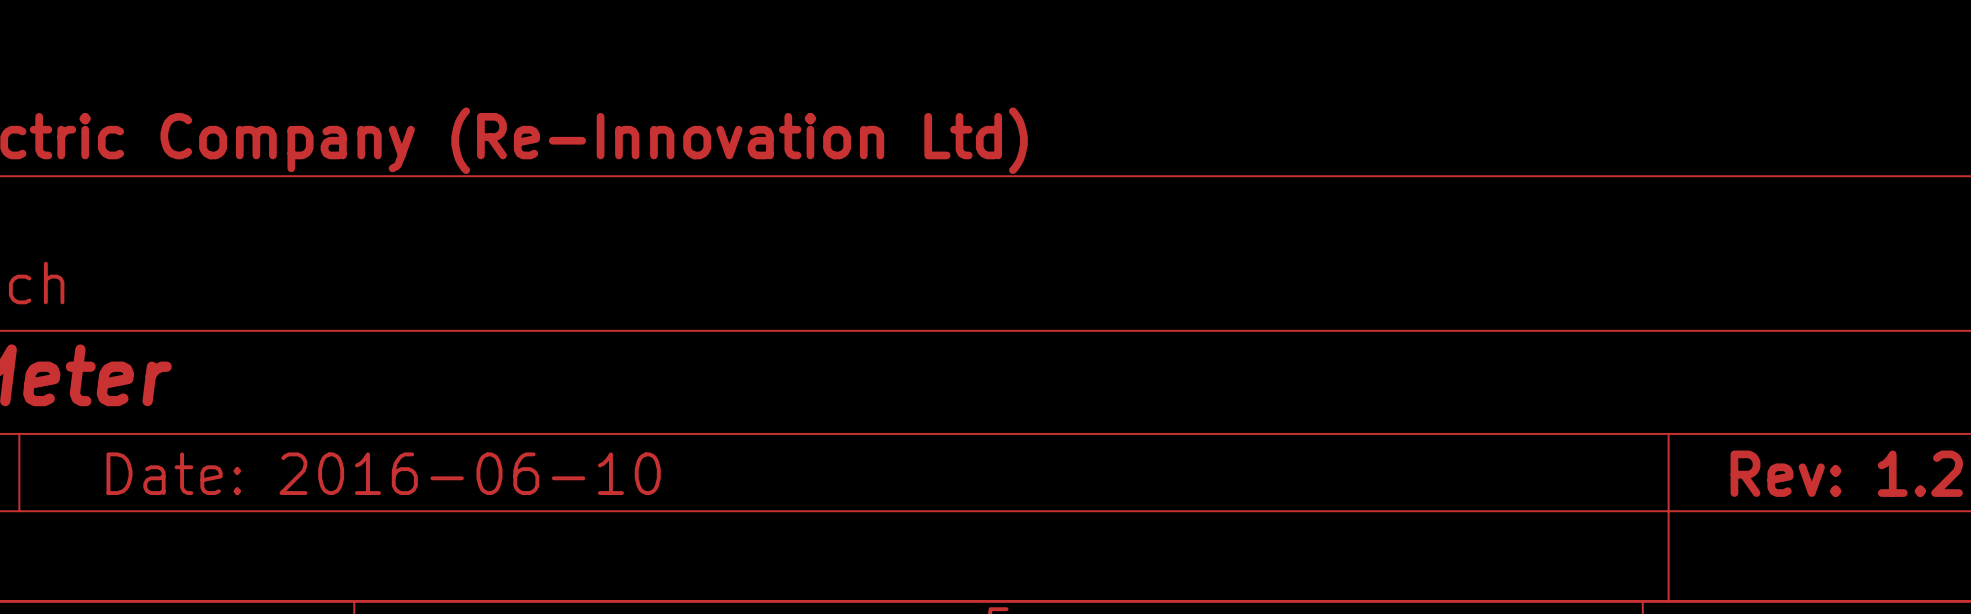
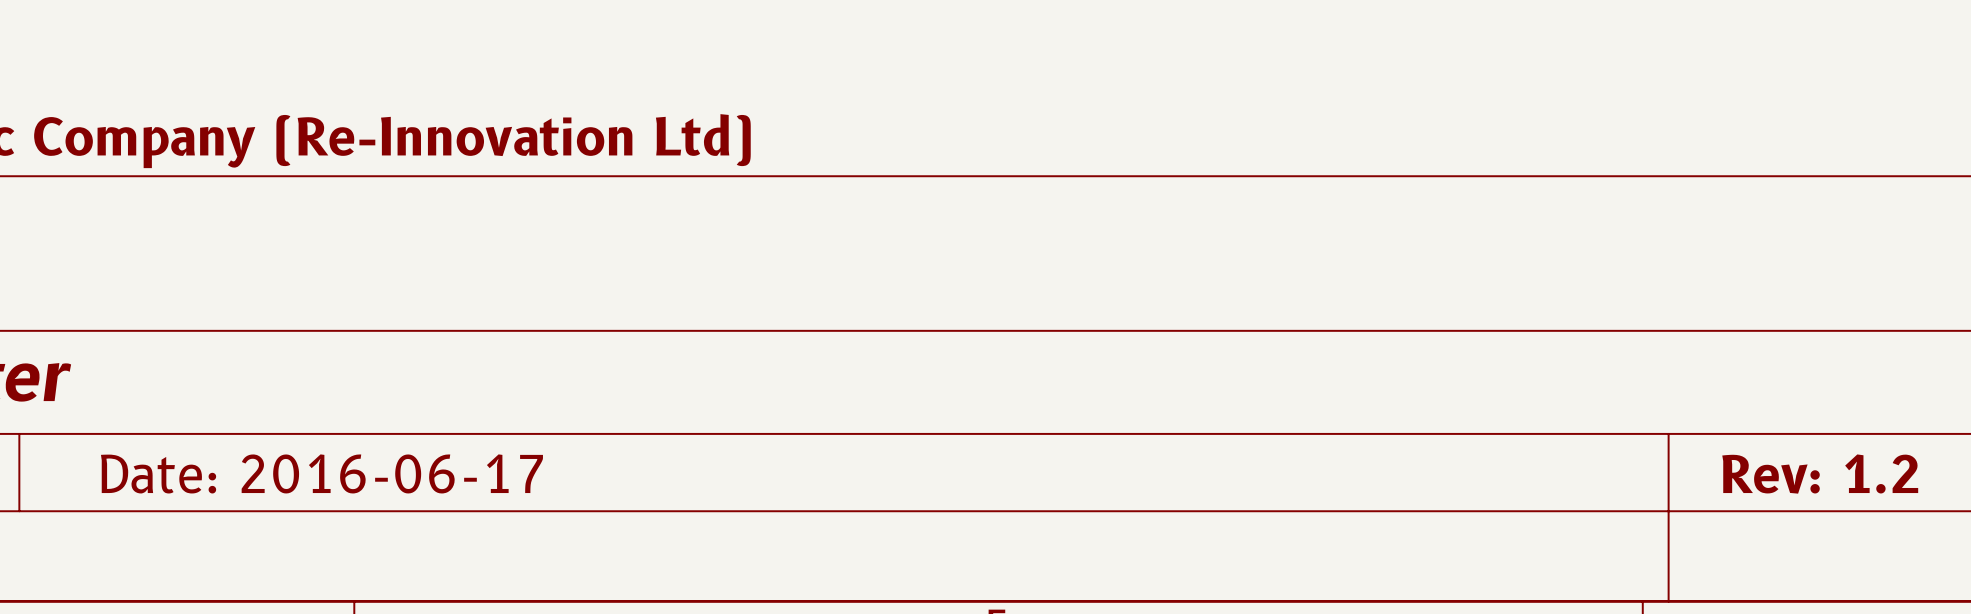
title block: Date: 2016-06-10 (383, 473) -> Date: 2016-06-17 (321, 473)

